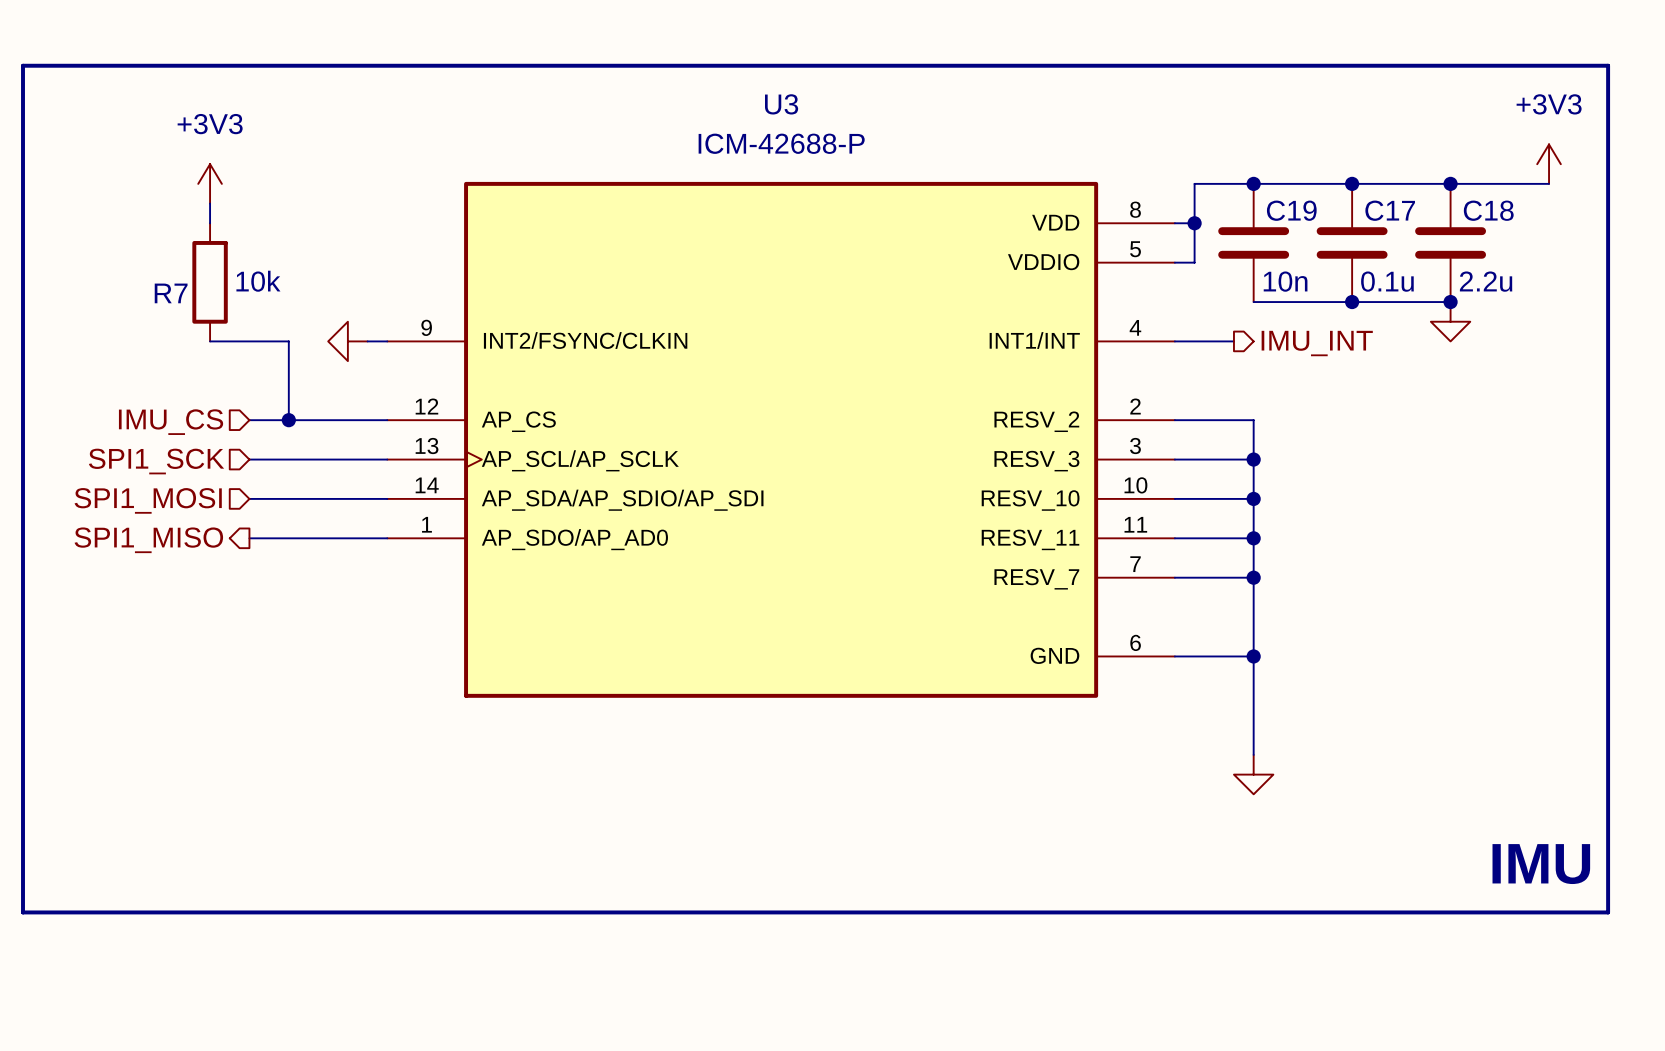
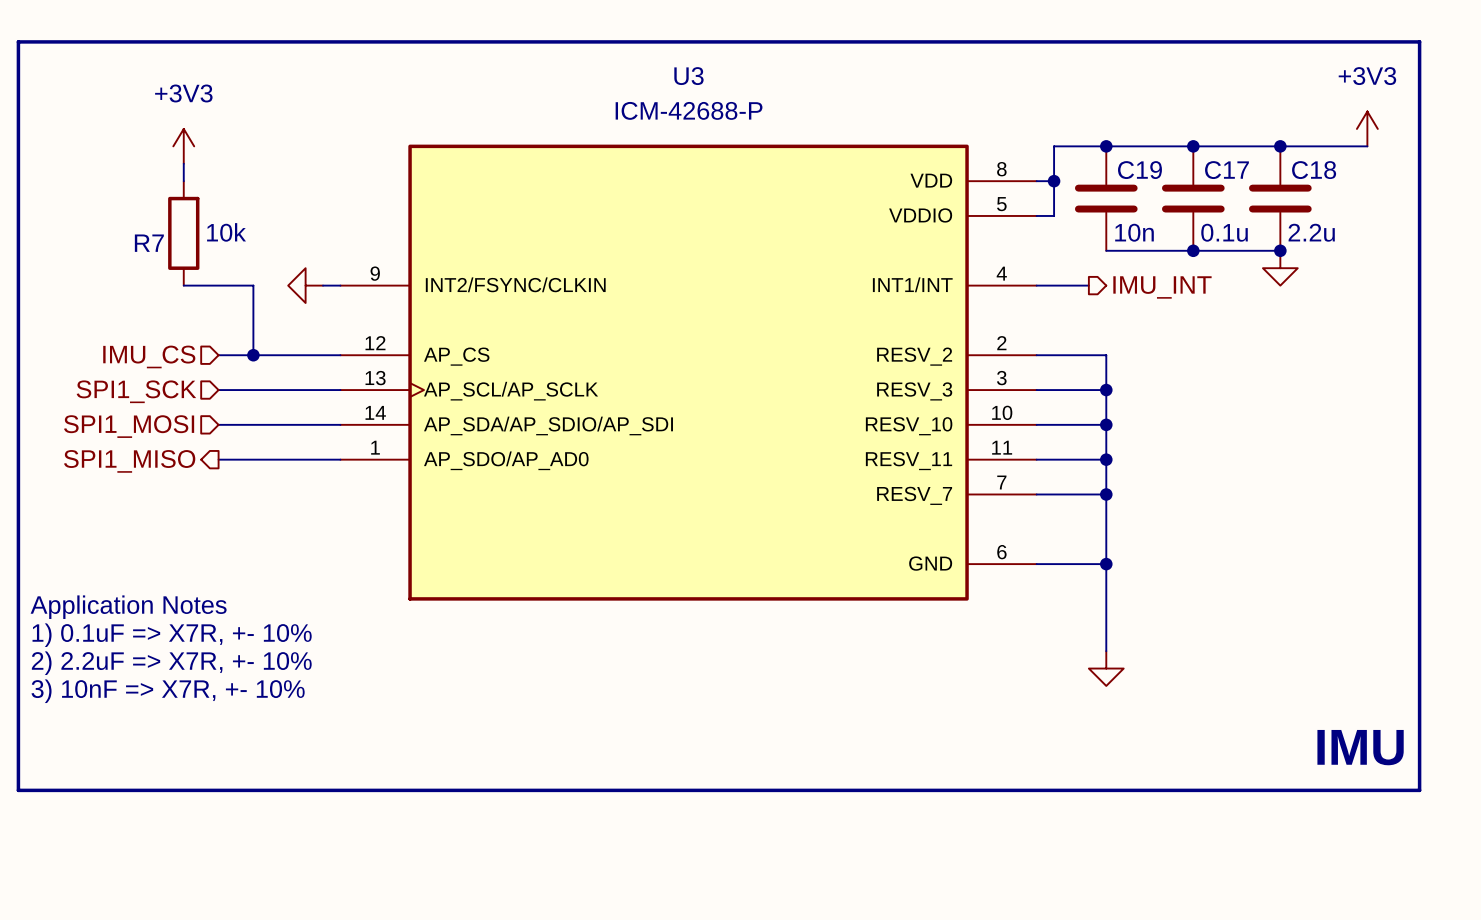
text: none -> Application Notes (128, 607)
text: none -> 1) 0.1uF => X7R, +- 10% (172, 635)
text: none -> 2) 2.2uF => X7R, +- 10% (171, 663)
text: none -> 3) 10nF => X7R, +- 10% (168, 691)

